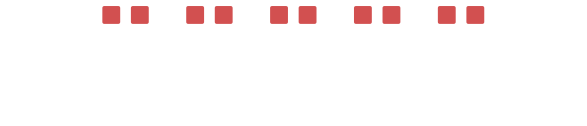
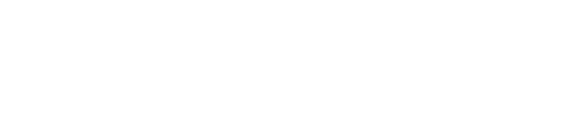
part: (125, 14) -> none
part: (209, 14) -> none
part: (293, 14) -> none
part: (377, 14) -> none
part: (461, 14) -> none

